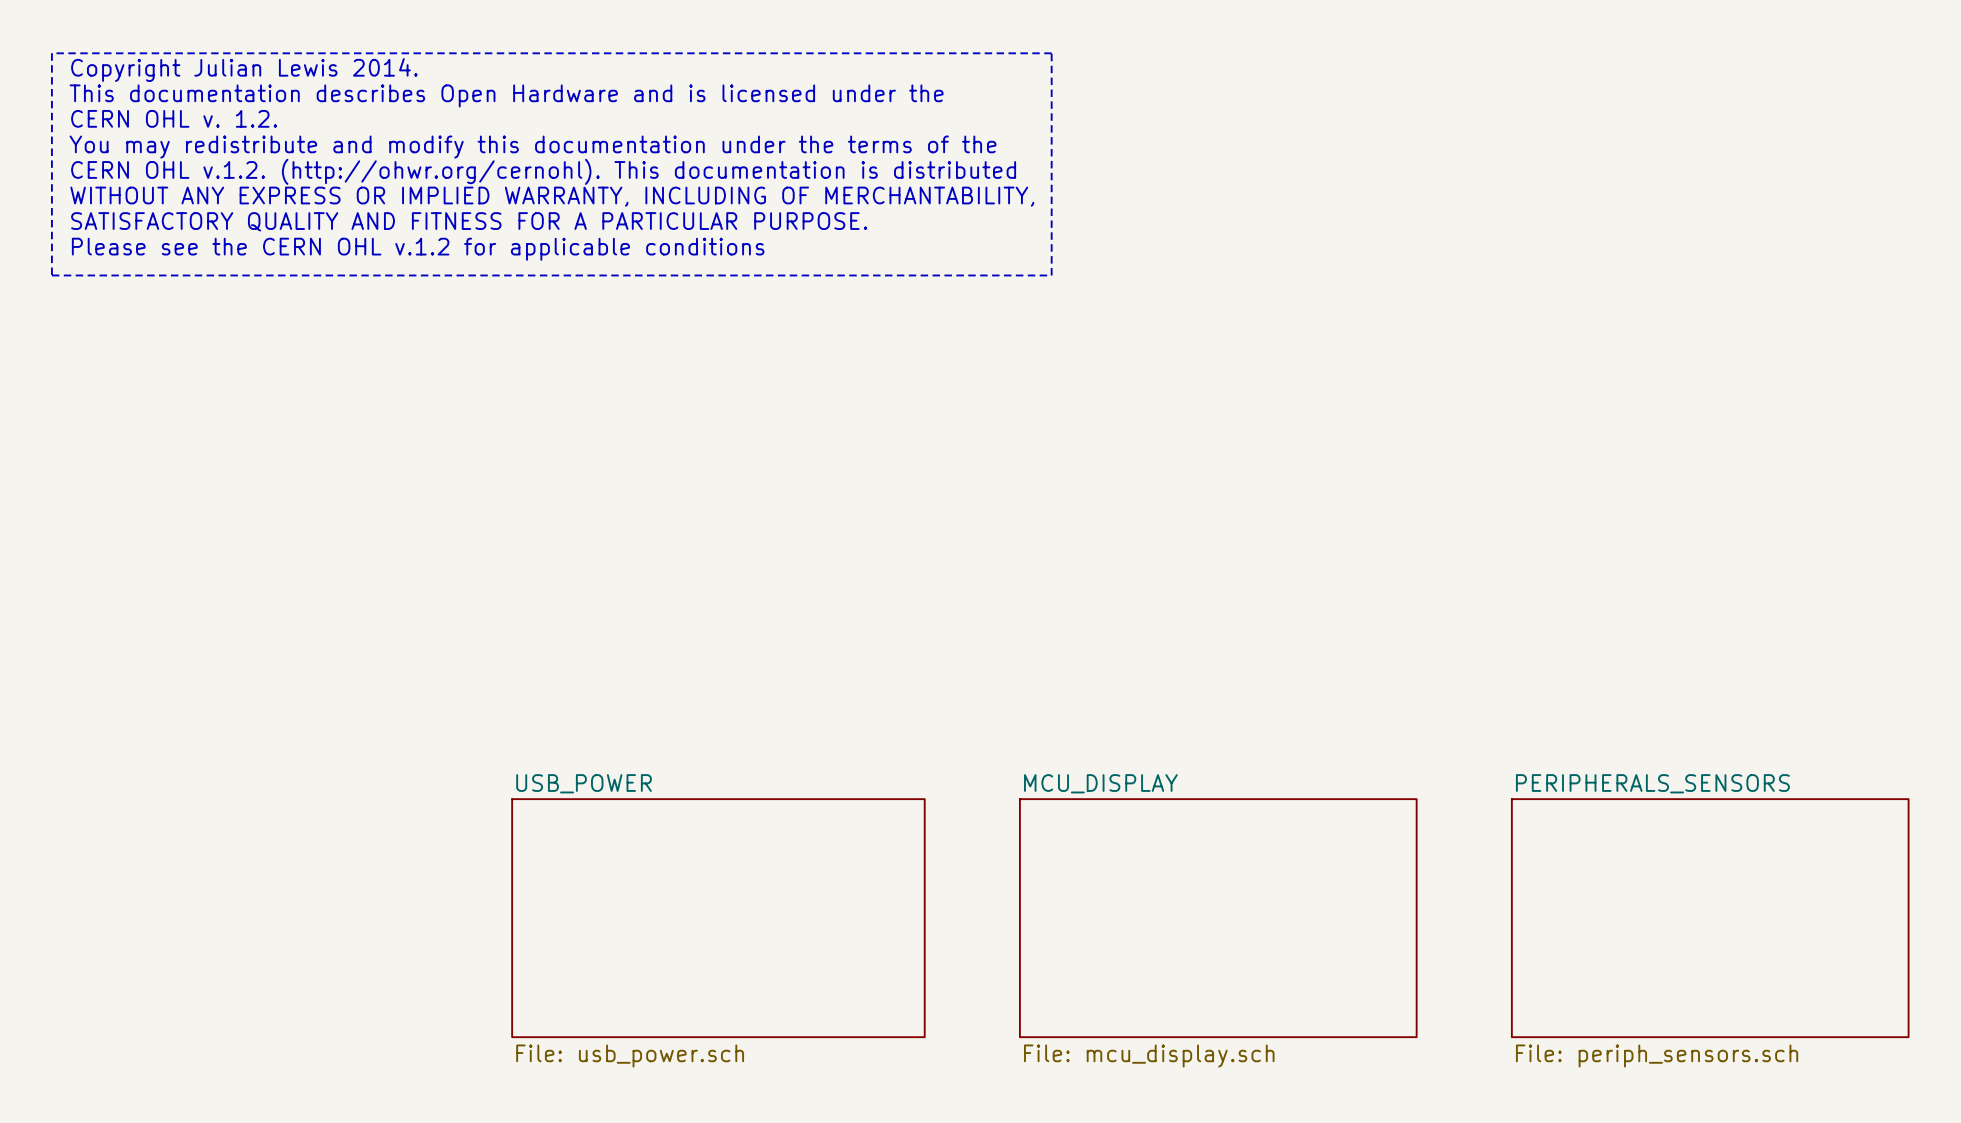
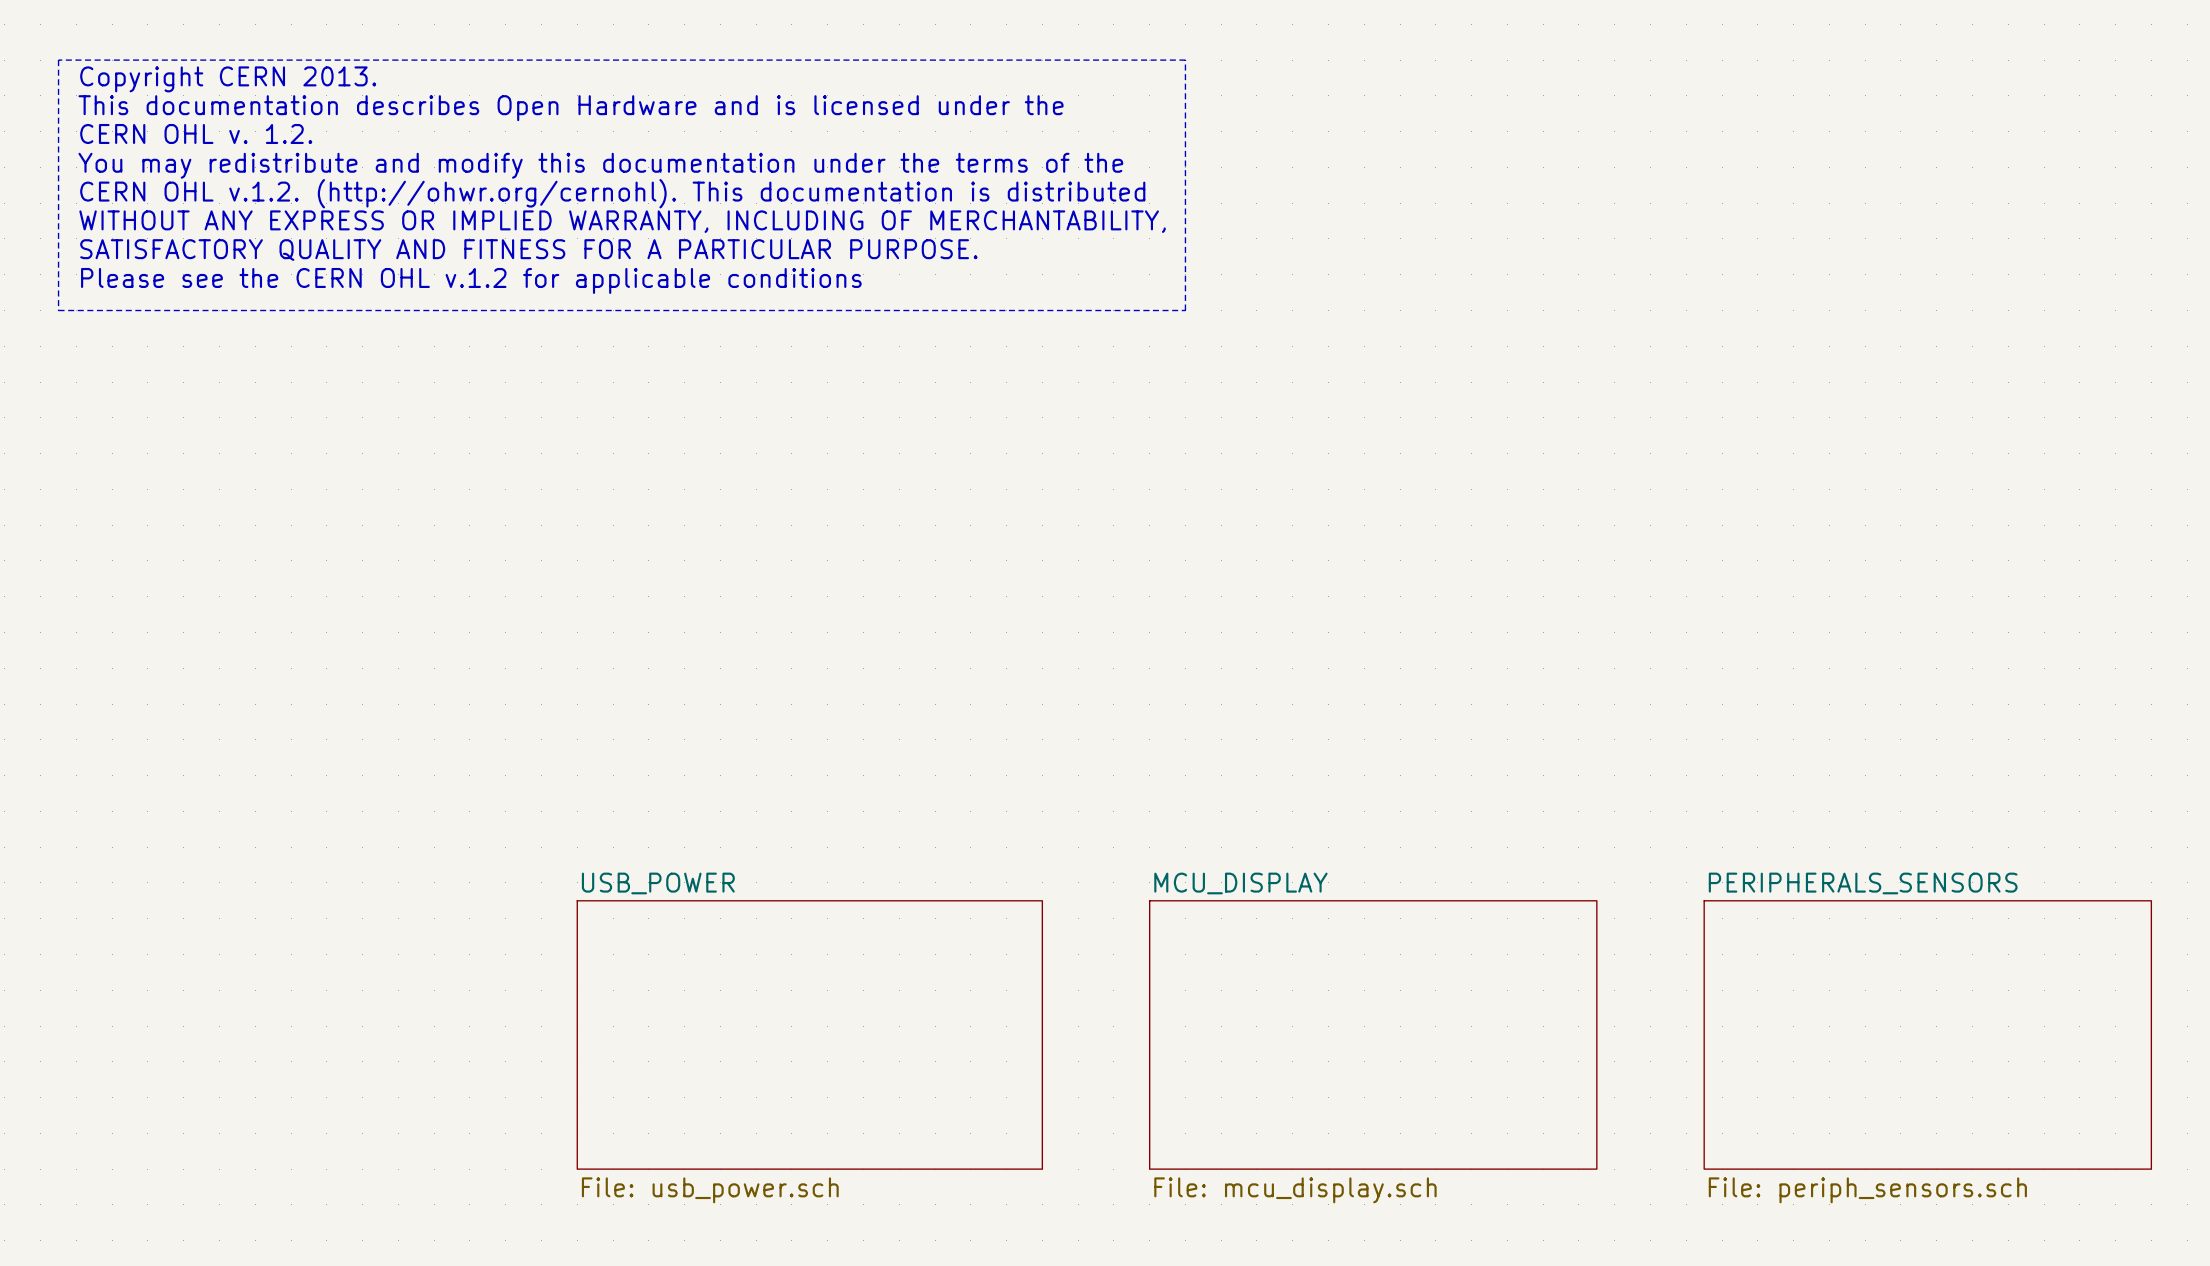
text: Copyright Julian Lewis 2014. (244, 70) -> Copyright CERN 2013. (228, 79)

